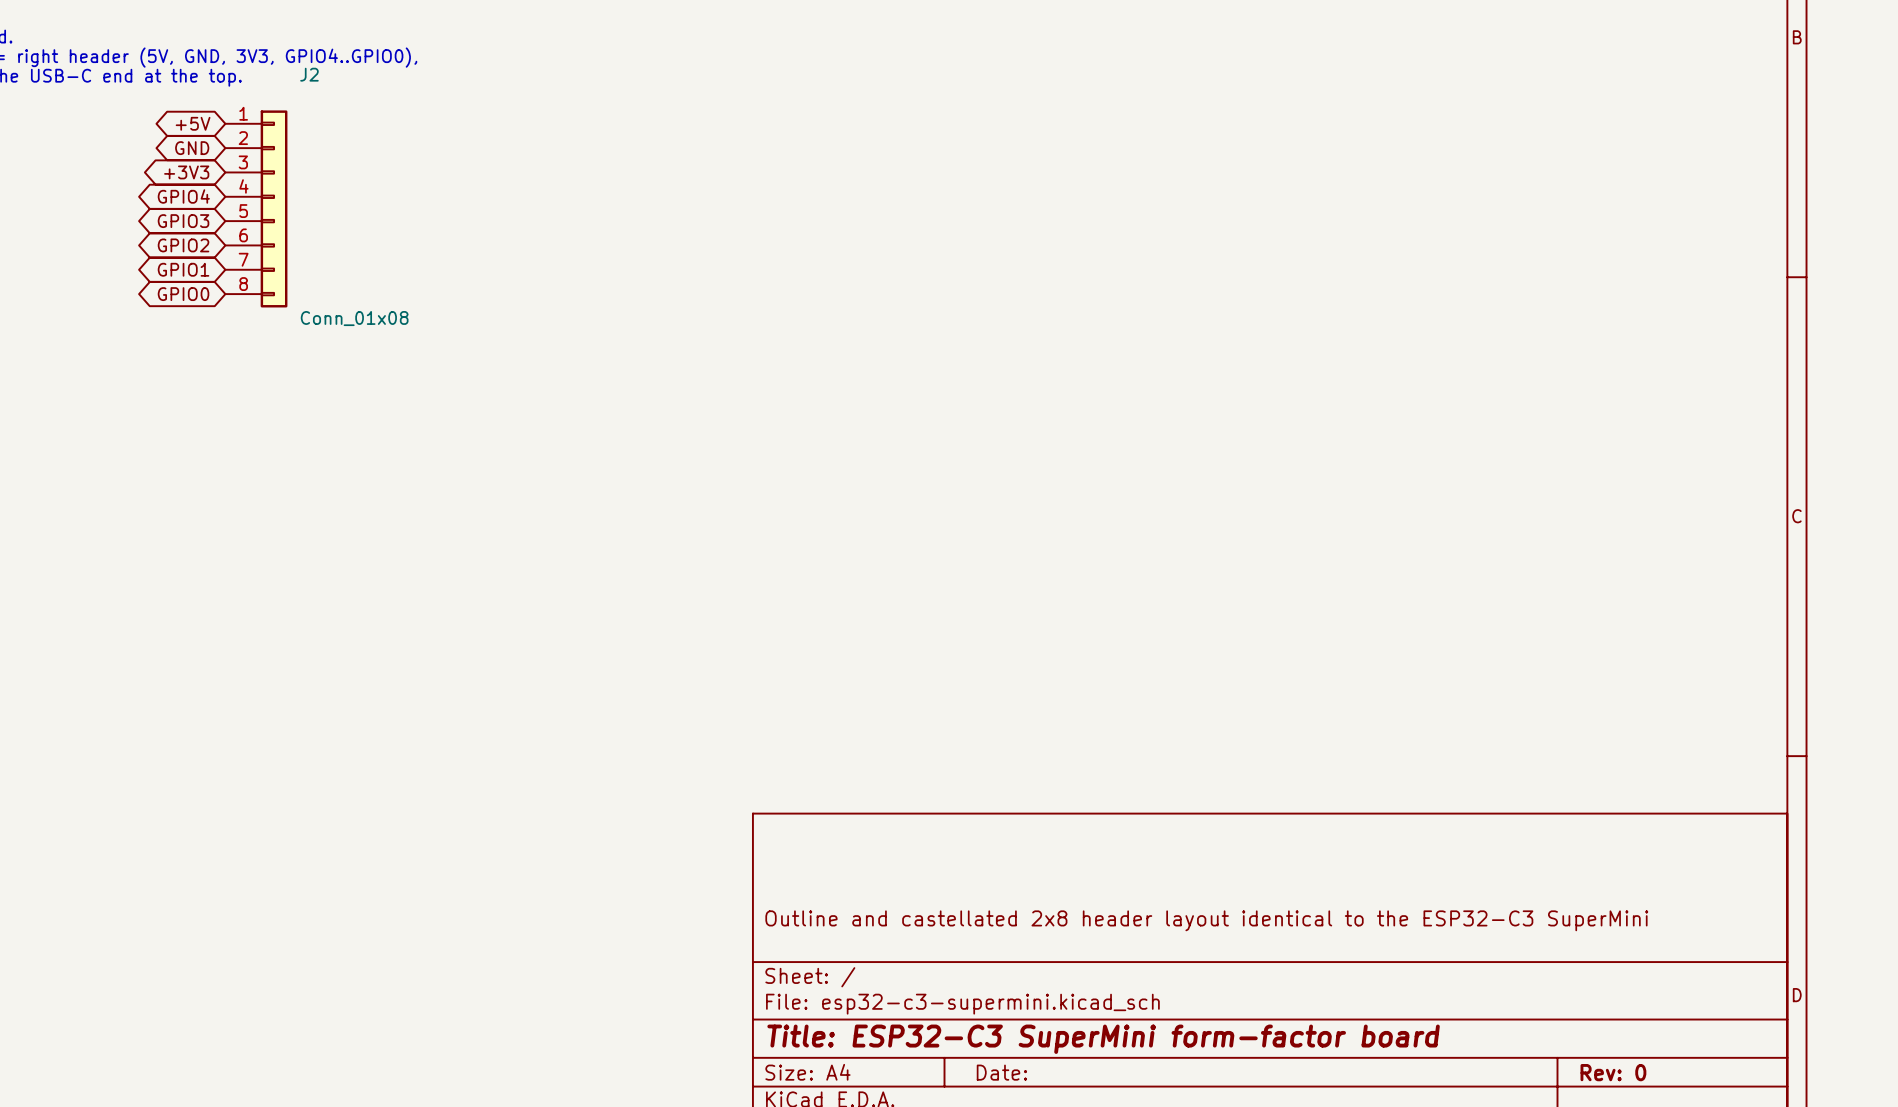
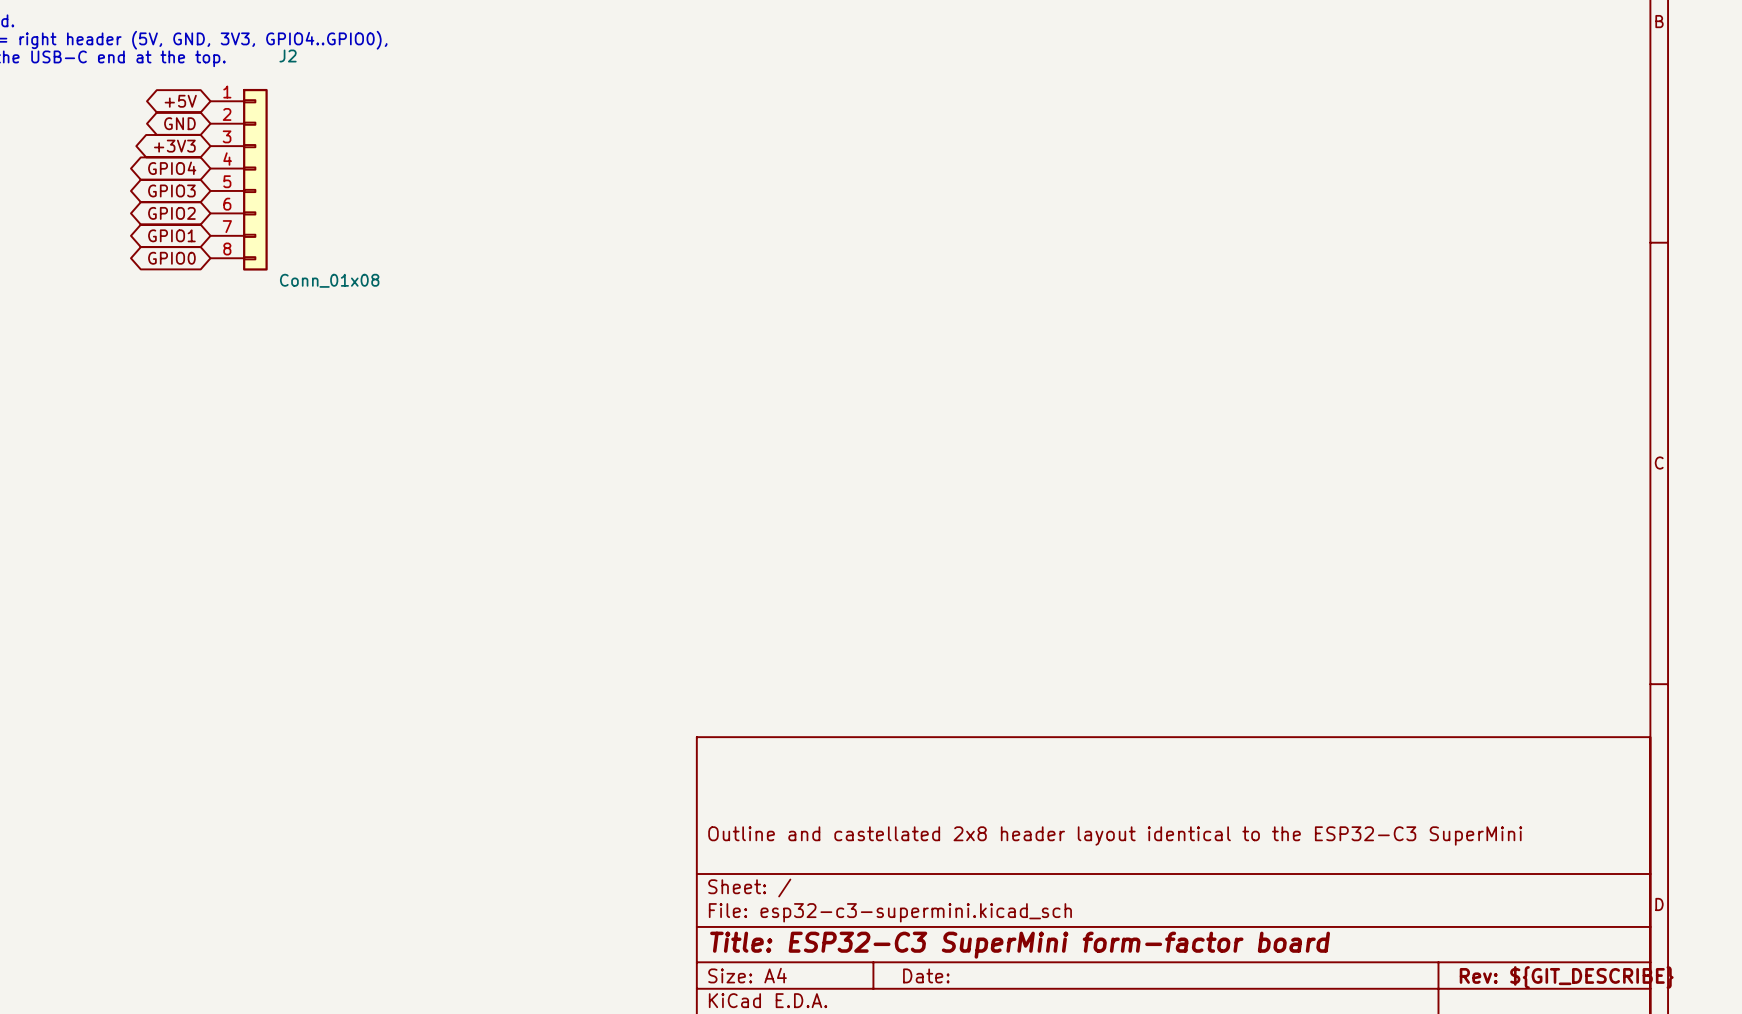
title block: Rev: 0 (1613, 1072) -> Rev: ${GIT_DESCRIBE} (1566, 977)

